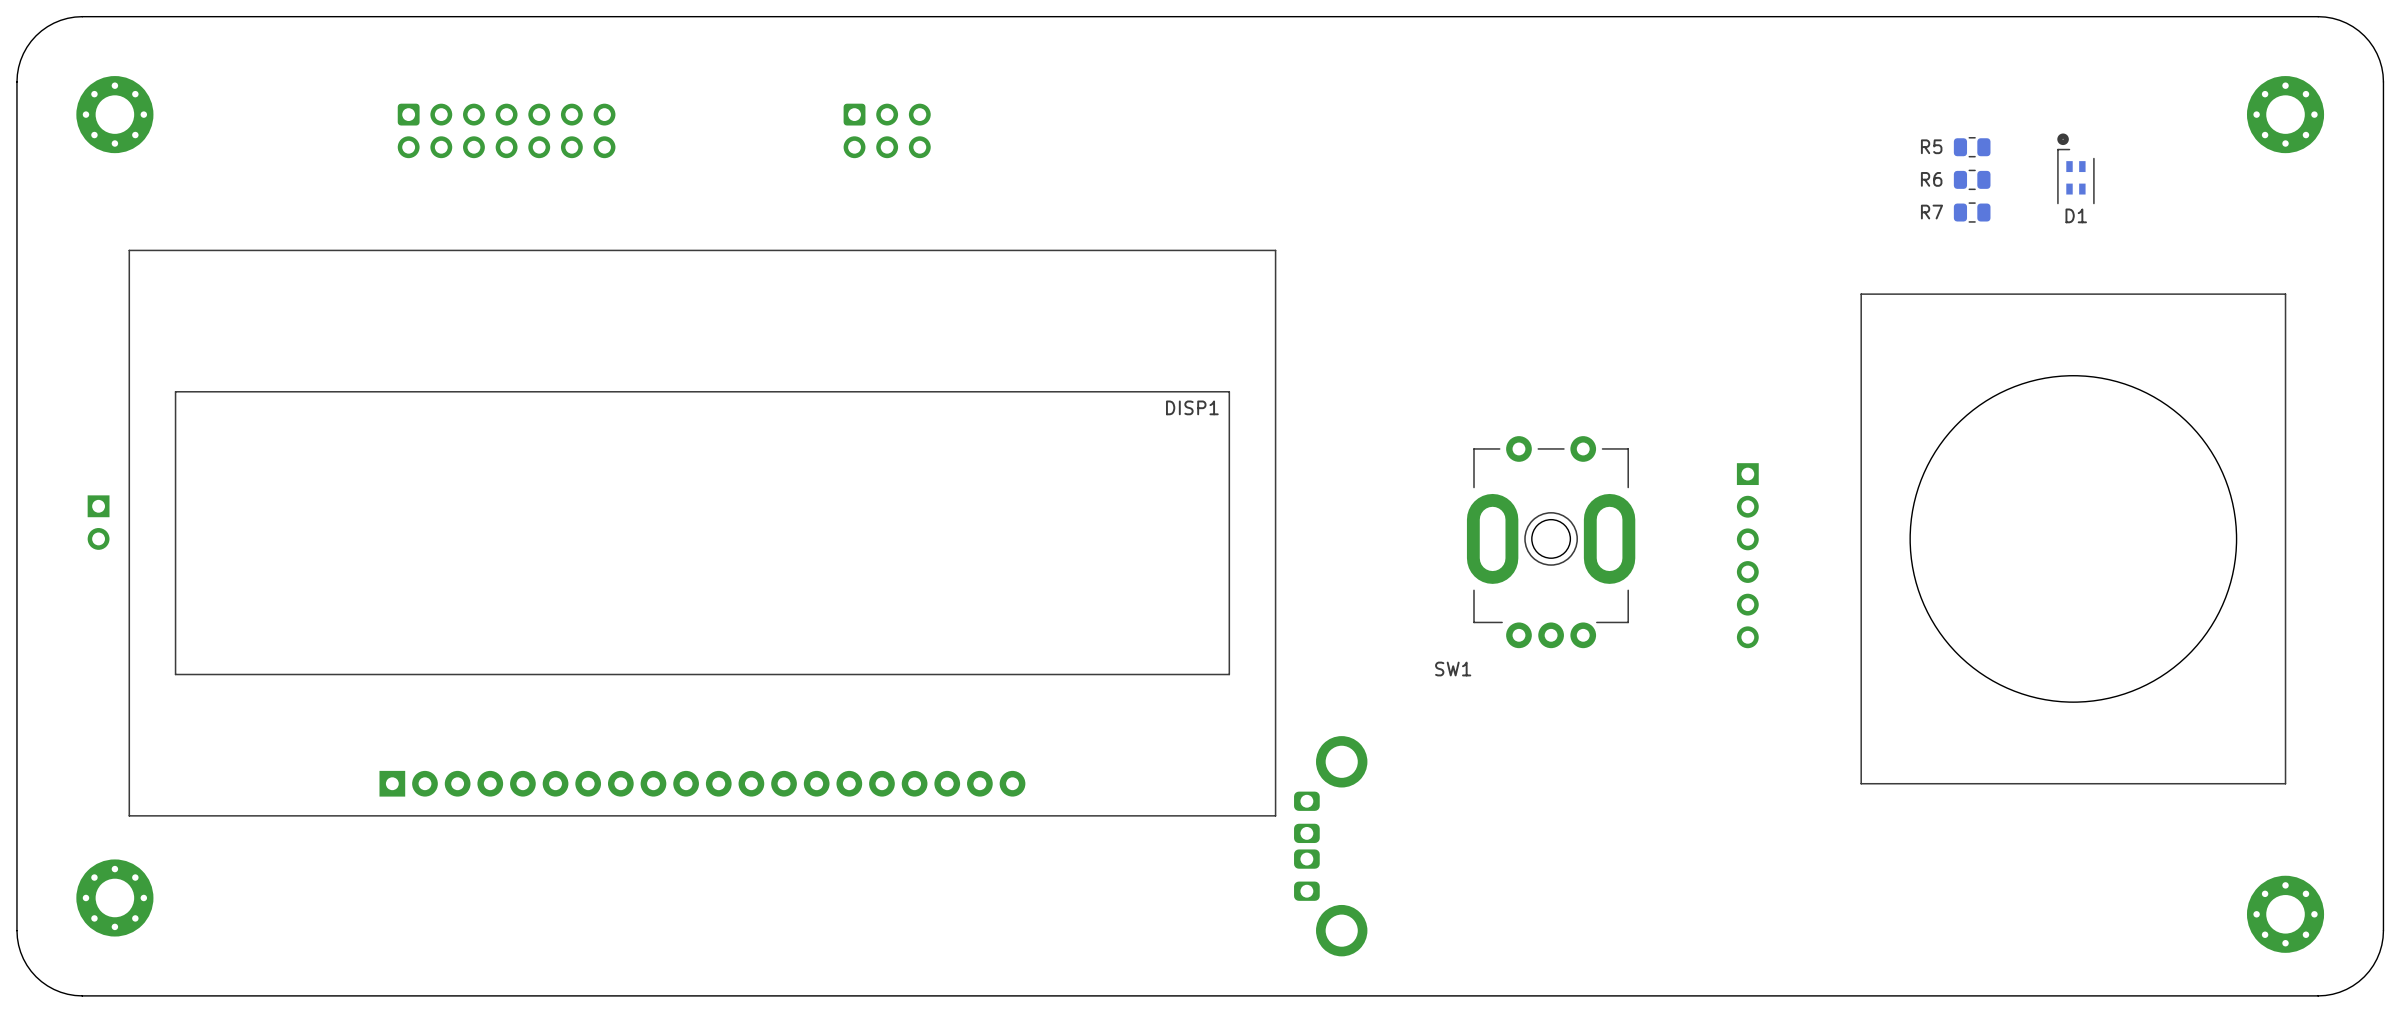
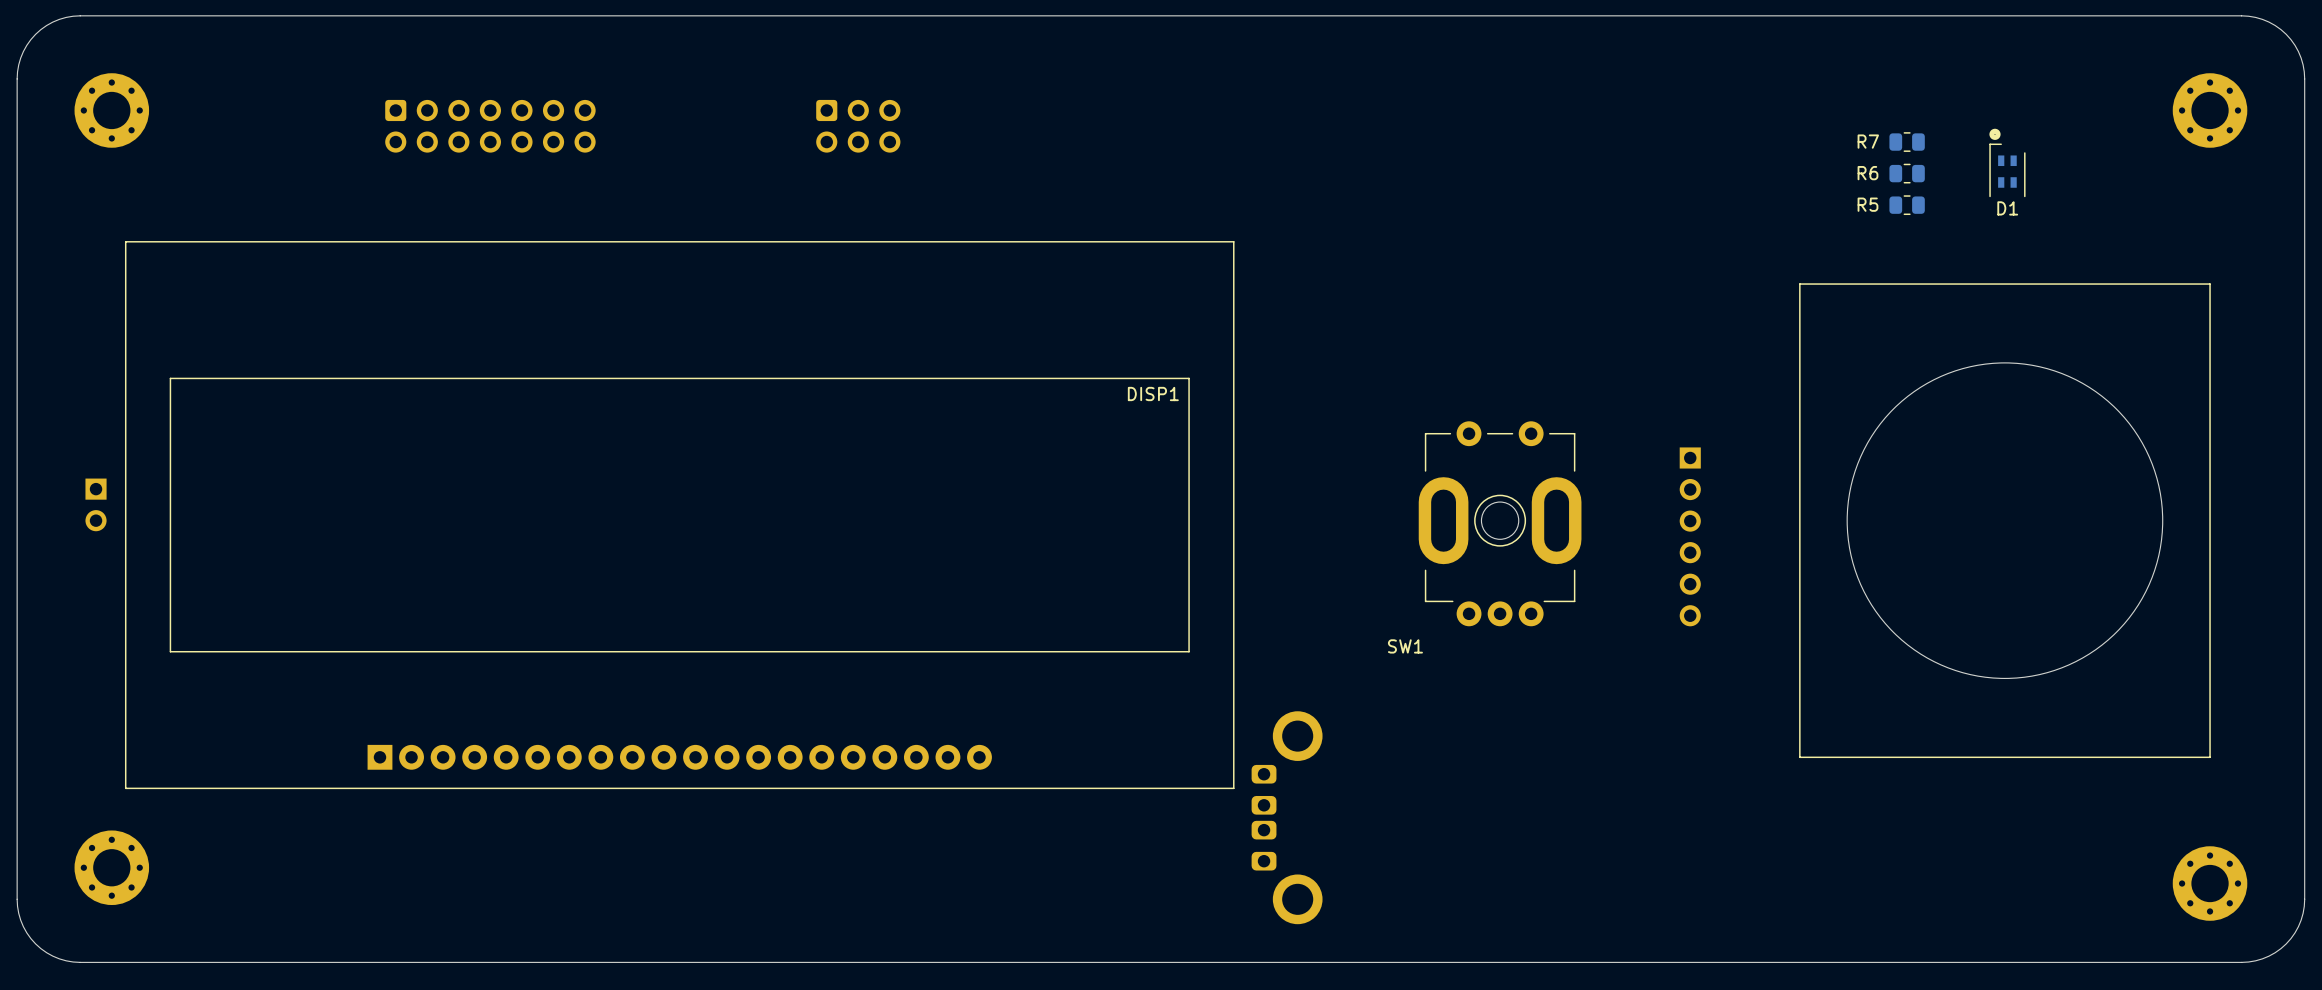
R5 name: R5 (1931, 146) -> R7 (1868, 141)
R7 name: R7 (1931, 212) -> R5 (1867, 204)

